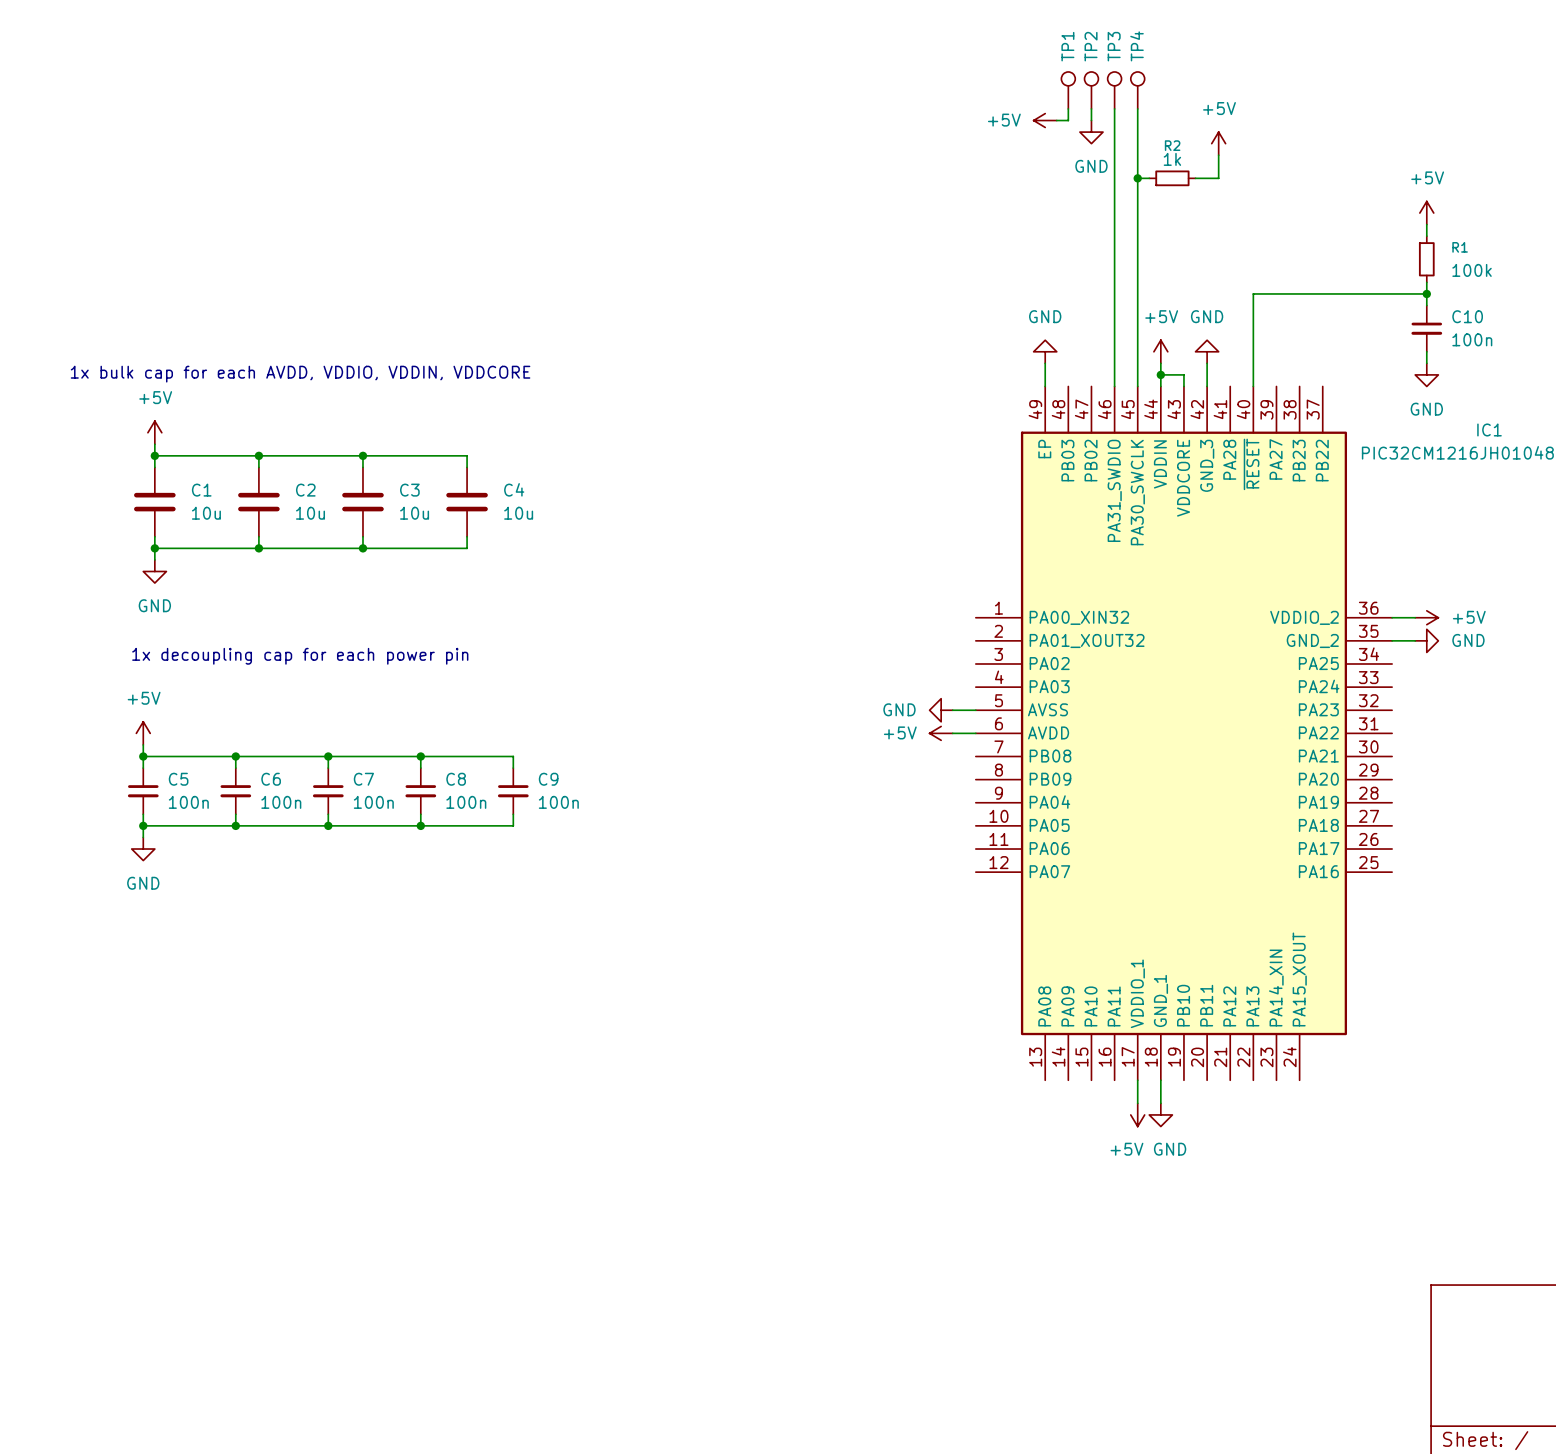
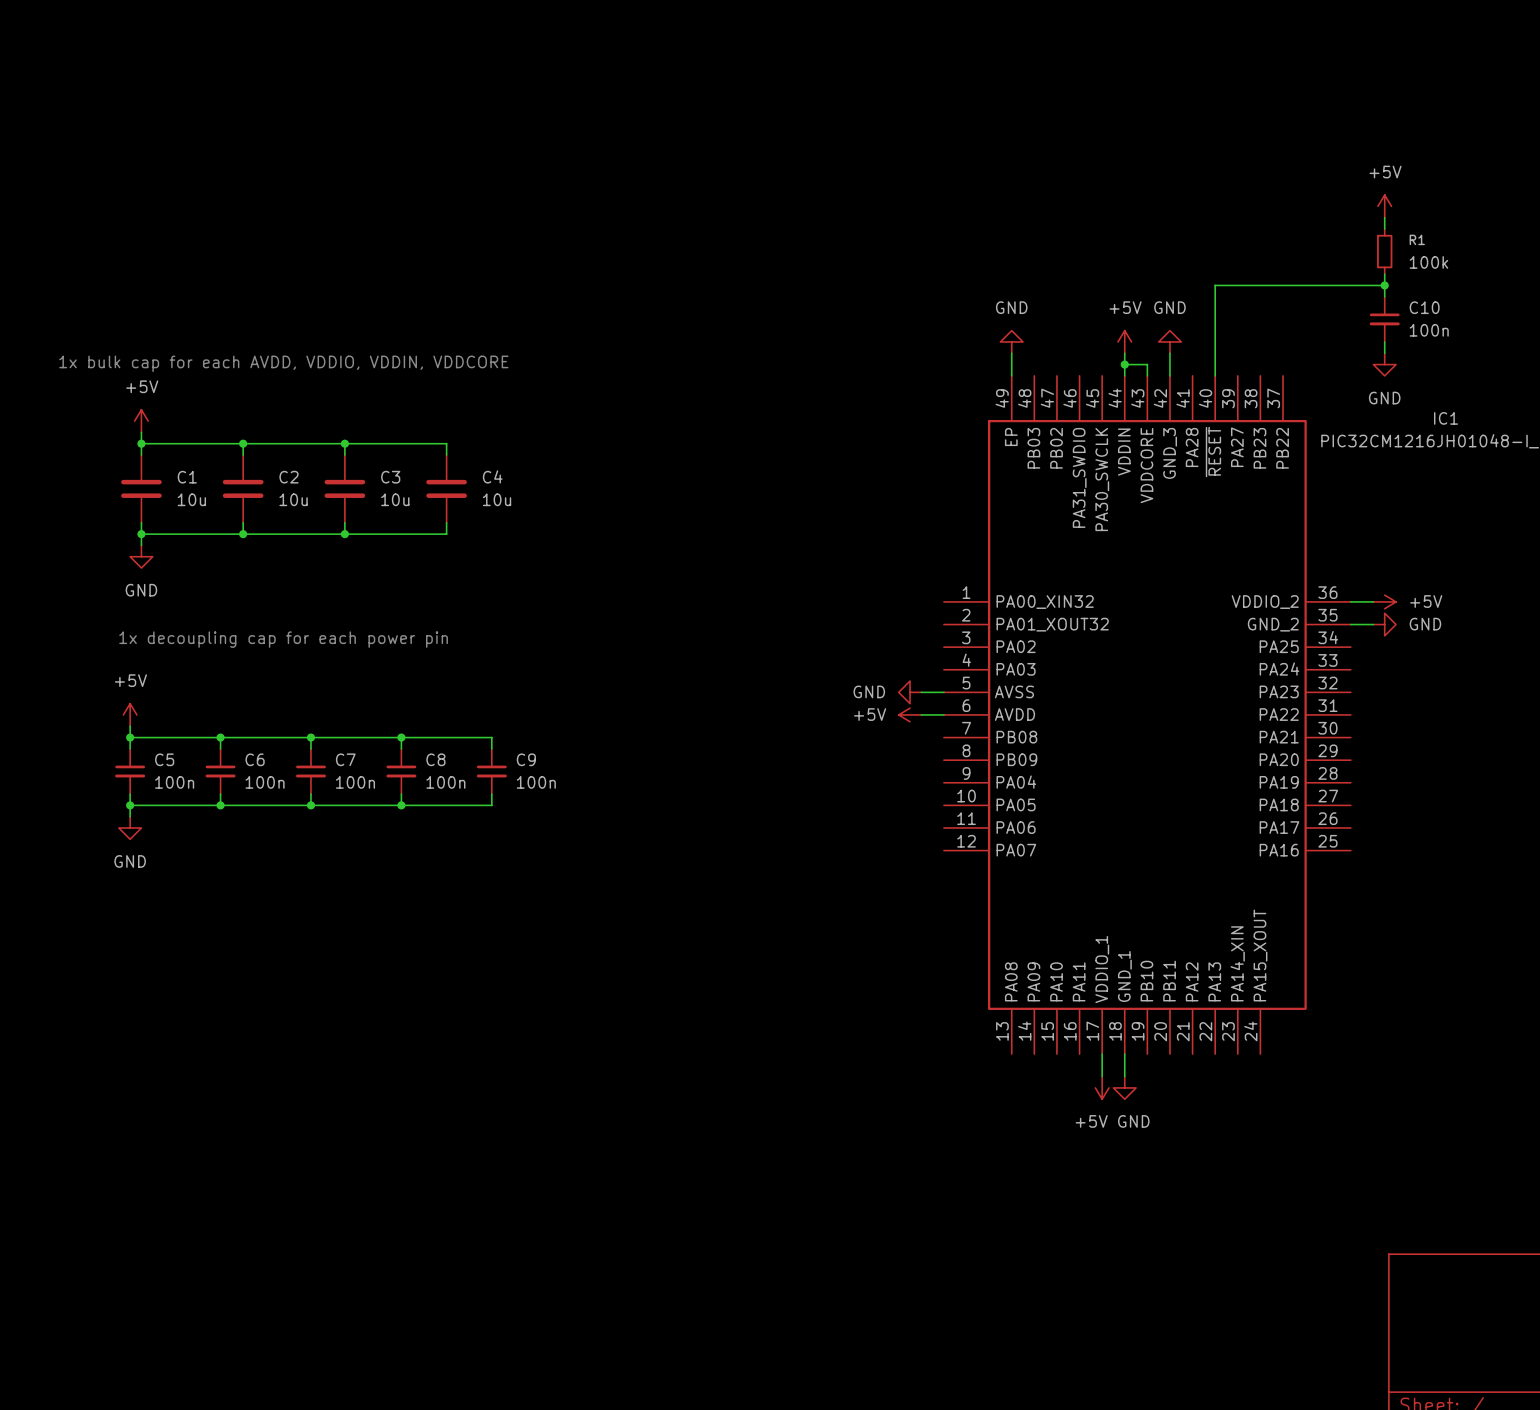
TP1: (1068, 90) -> none
TP2: (1091, 90) -> none
TP3: (1114, 90) -> none
TP4: (1137, 90) -> none
wire: (1068, 108) (1068, 120) (1056, 120) -> none
wire: (1091, 108) (1091, 120) -> none
wire: (1114, 108) (1114, 386) -> none
wire: (1137, 108) (1137, 386) -> none
power symbol: +5V (1045, 120) -> none
power symbol: GND (1091, 132) -> none
power symbol: +5V (1218, 143) -> none
wire: (1218, 155) (1218, 178) (1195, 178) -> none
wire: (1137, 178) (1149, 178) -> none
junction: (1137, 178) -> none
R2: 1k (1172, 178) -> none

